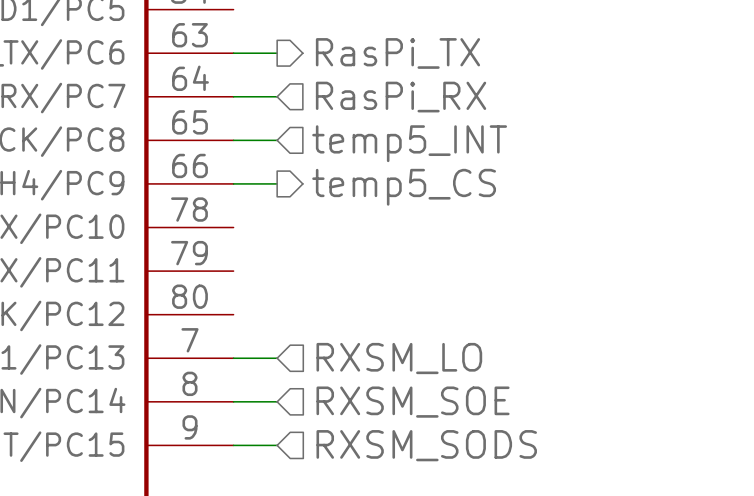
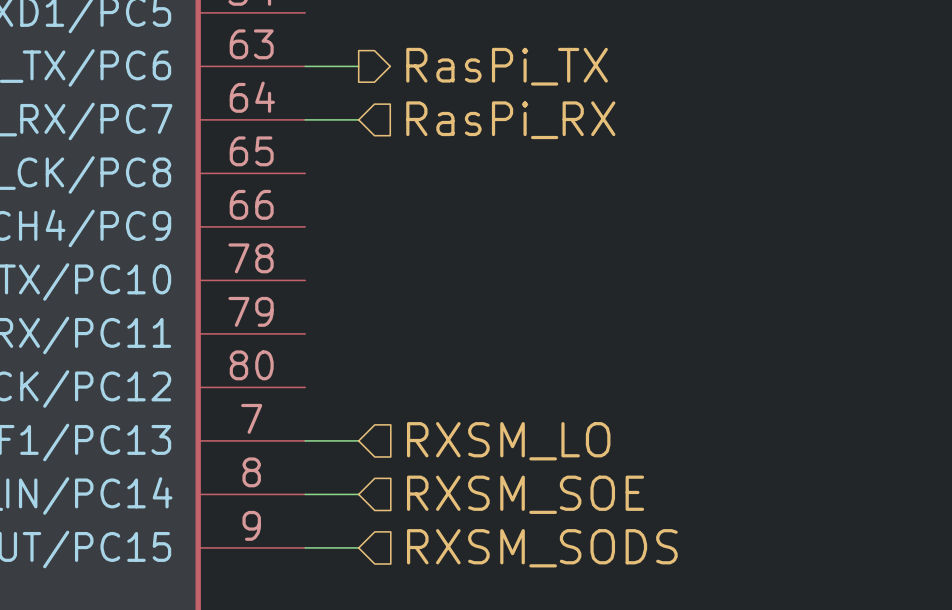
wire: (233, 140) (277, 140) -> none
hierarchical label: temp5_INT (409, 143) -> none
wire: (233, 183) (277, 183) -> none
hierarchical label: temp5_CS (404, 187) -> none

